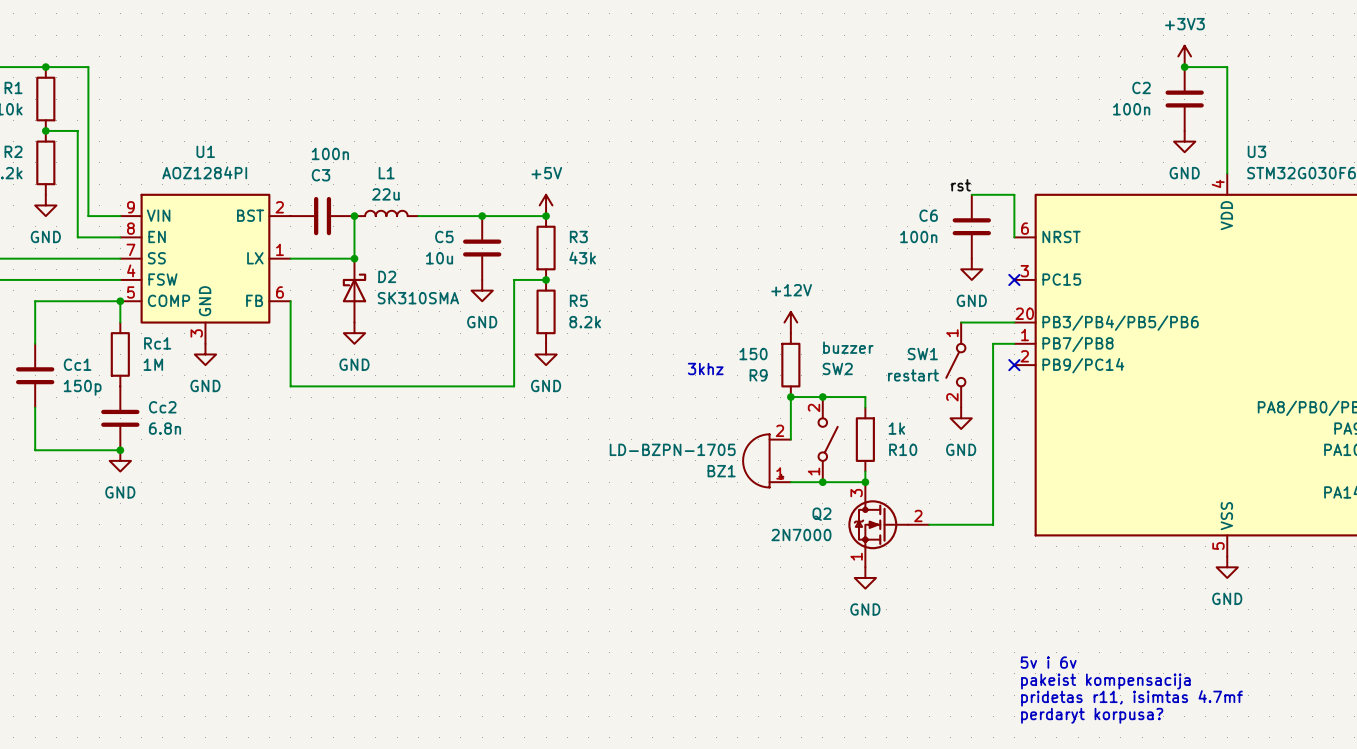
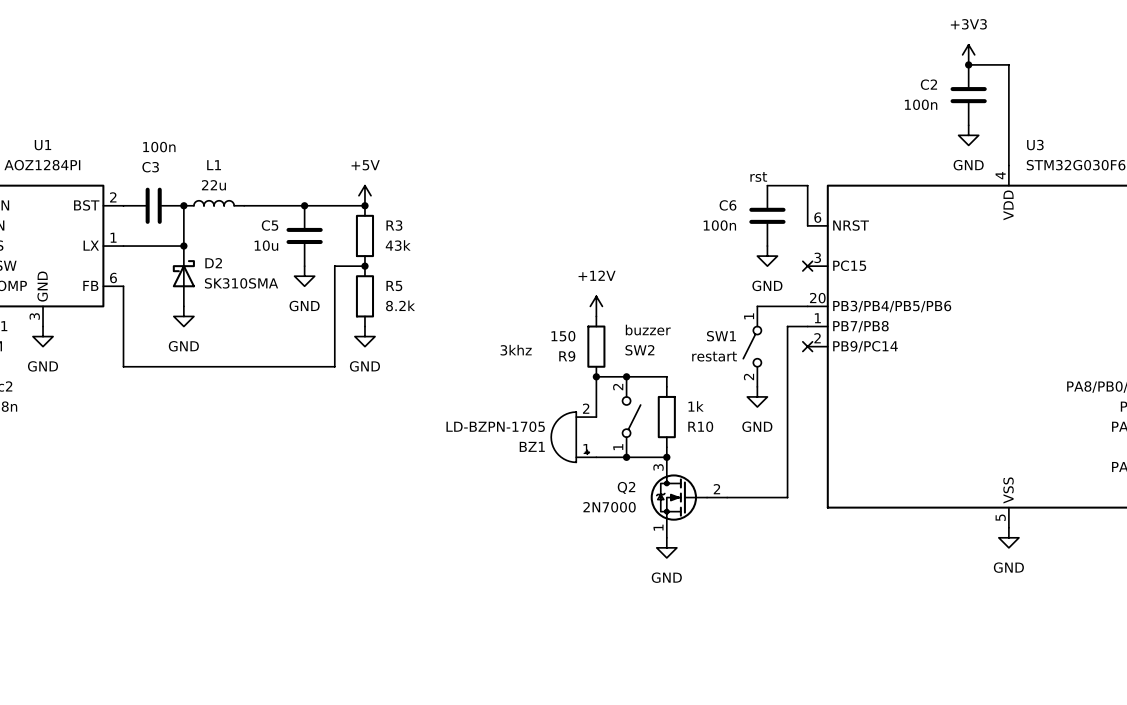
text: 5v i 6v (1048, 662) -> none
text: pakeist kompensacija (1105, 681) -> none
text: pridetas r11, isimtas 4.7mf (1131, 698) -> none
text: perdaryt korpusa? (1092, 715) -> none

